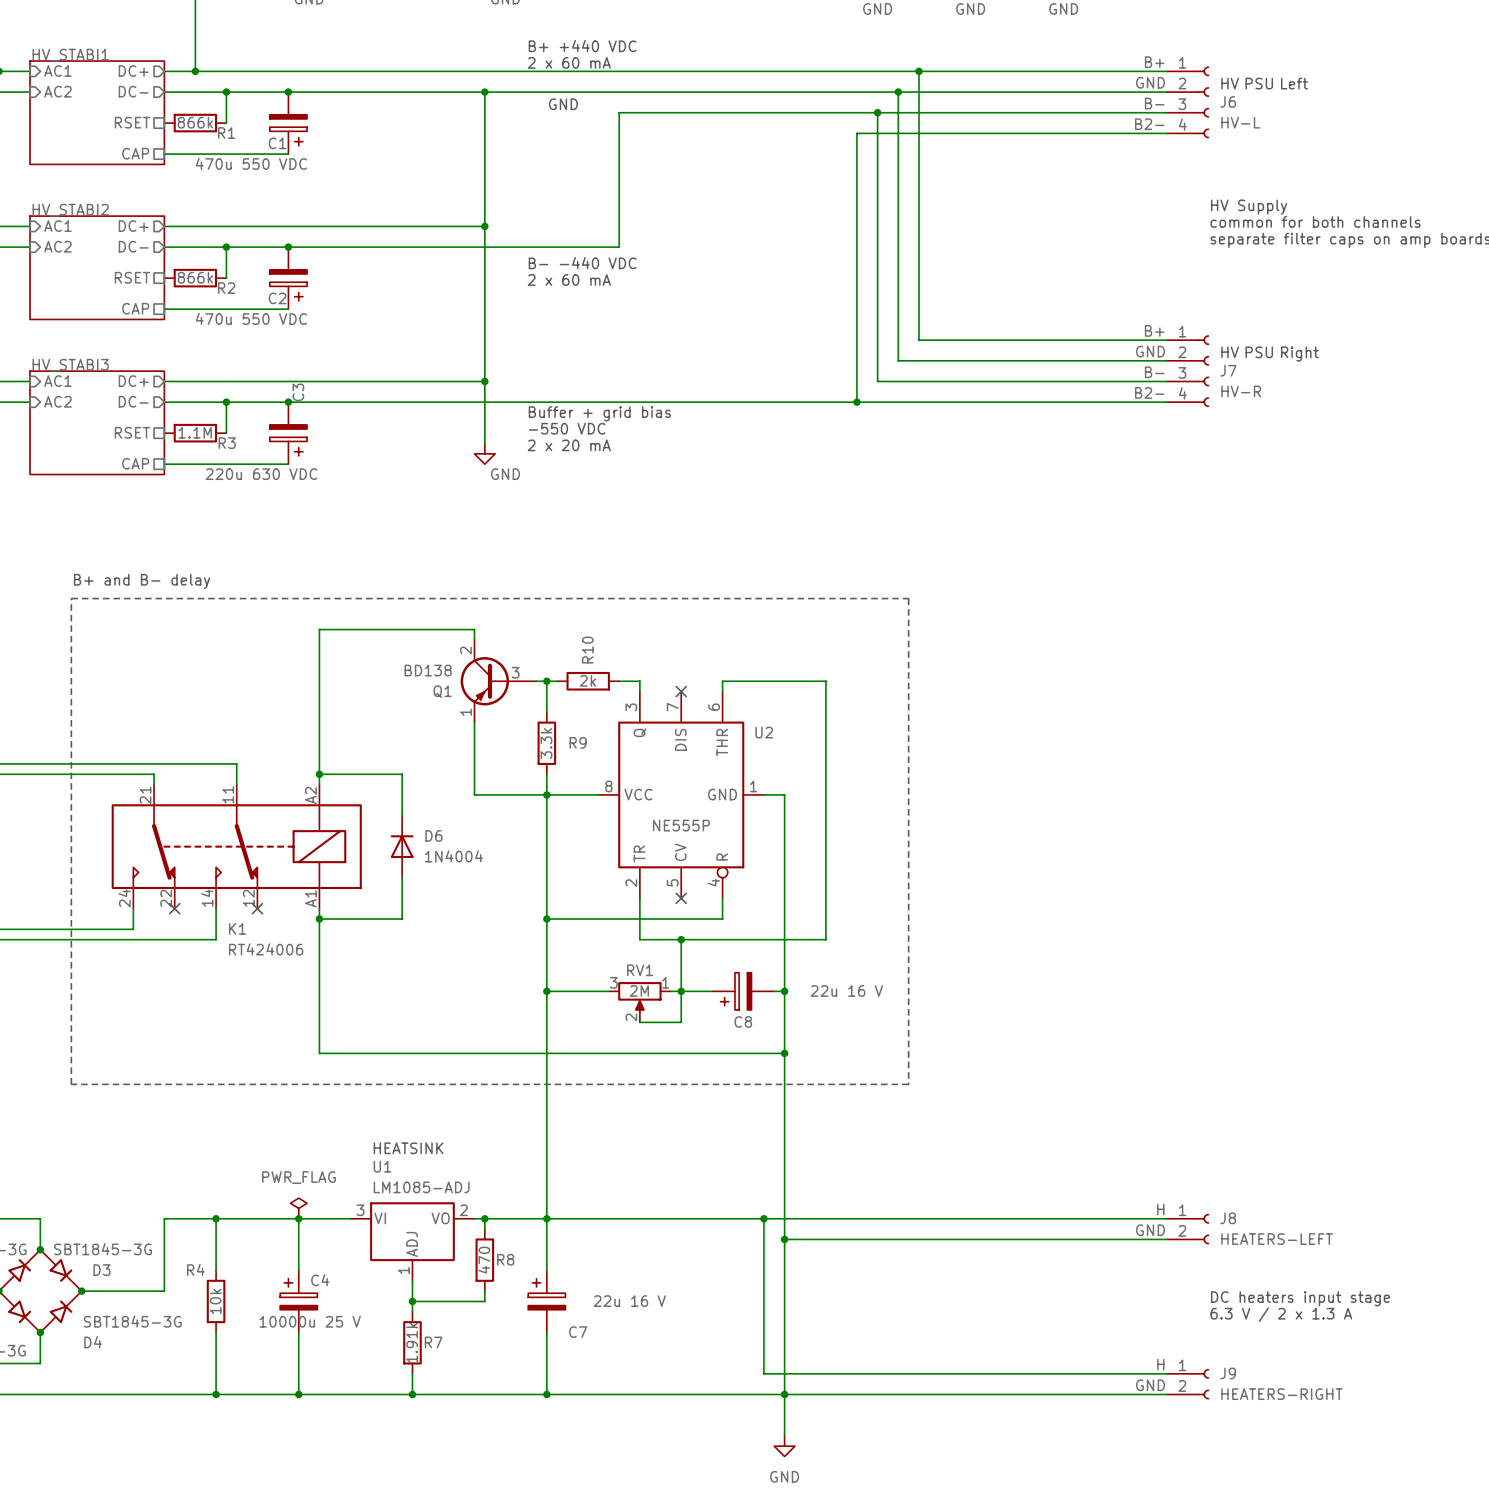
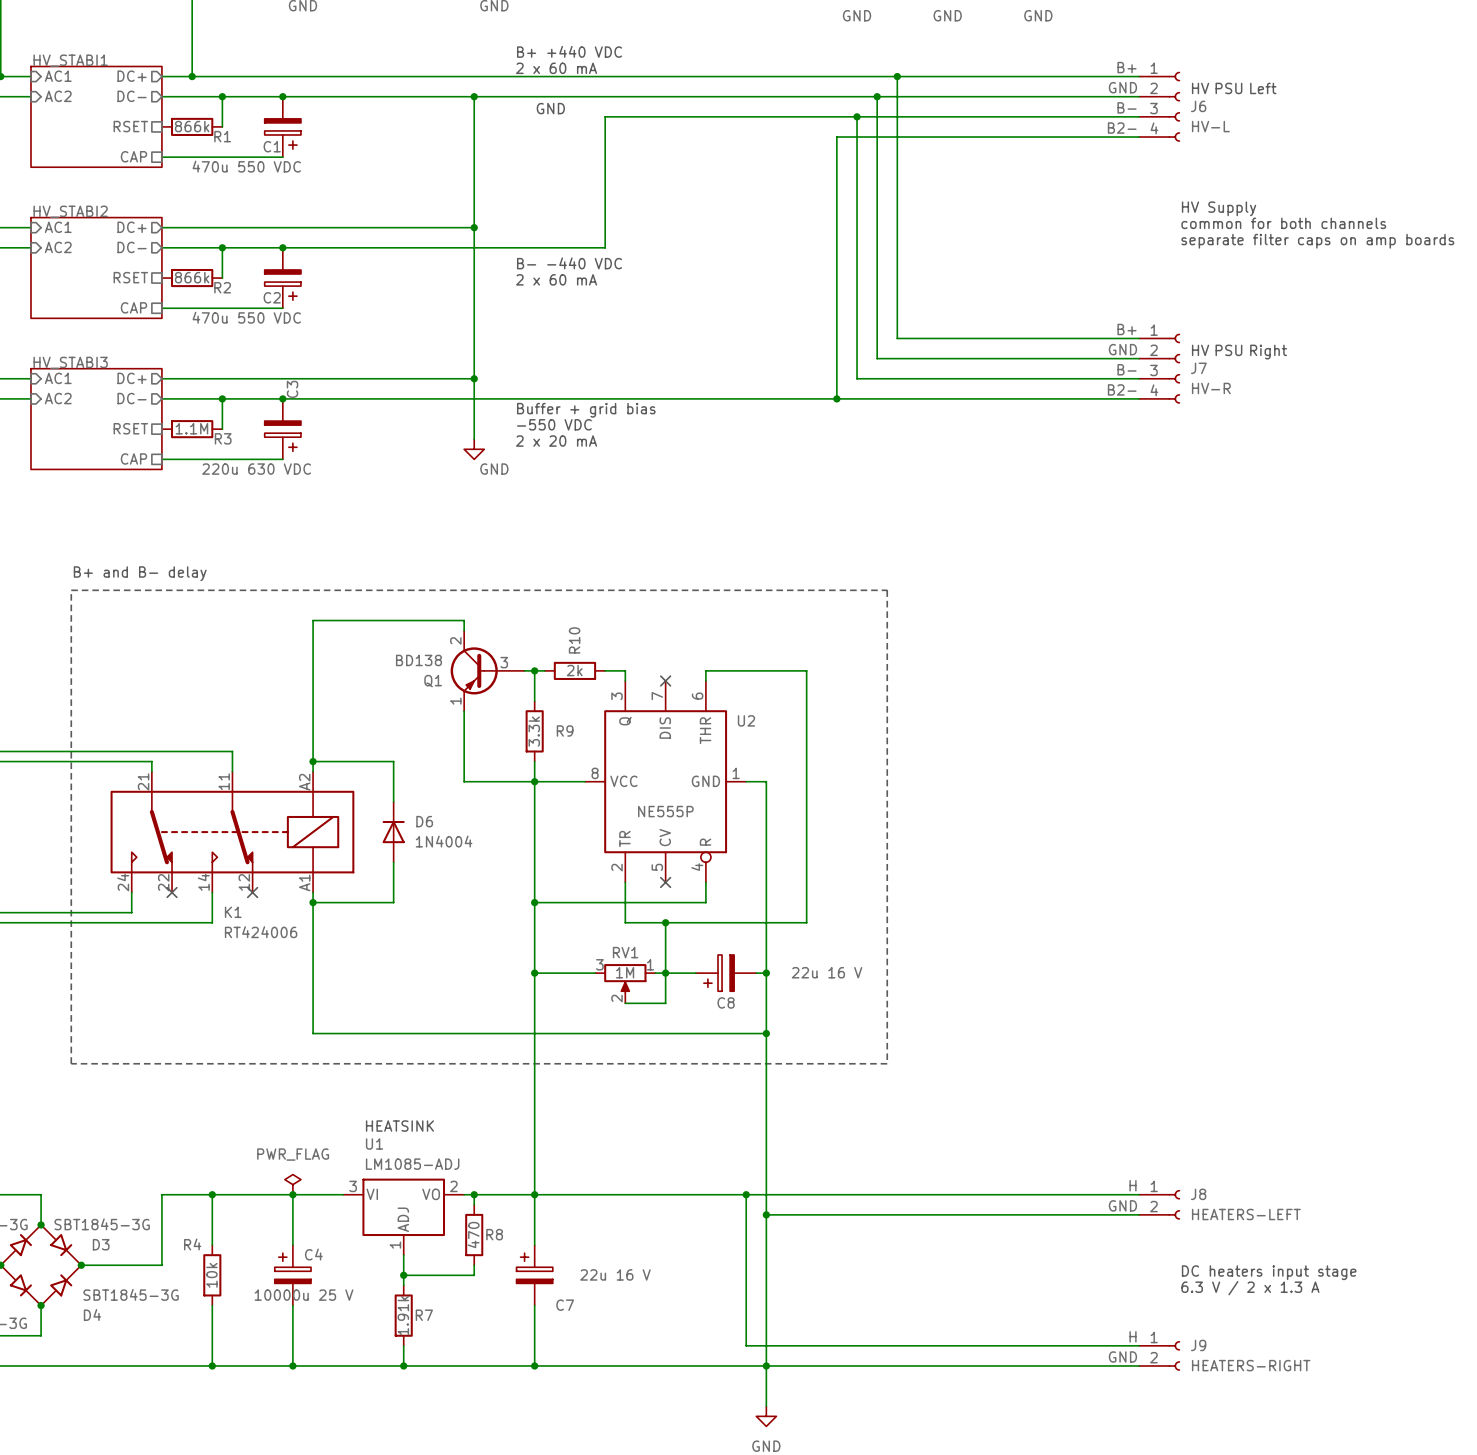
RV1 value: 2M (639, 990) -> 1M (625, 972)

